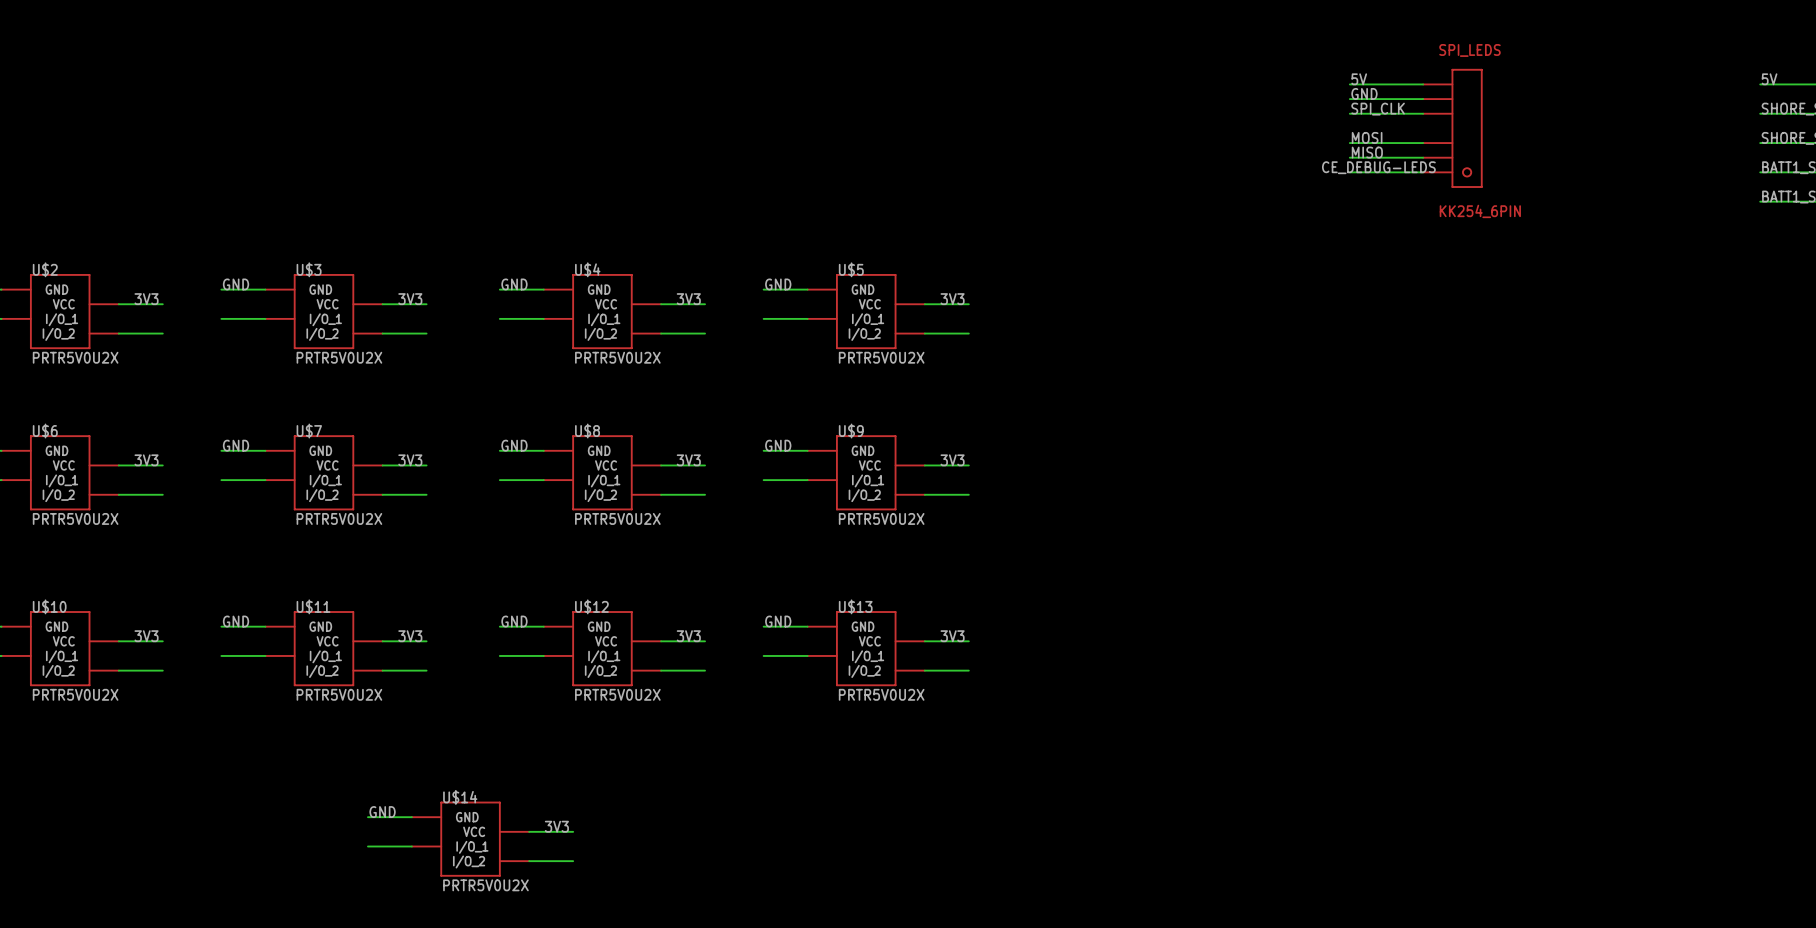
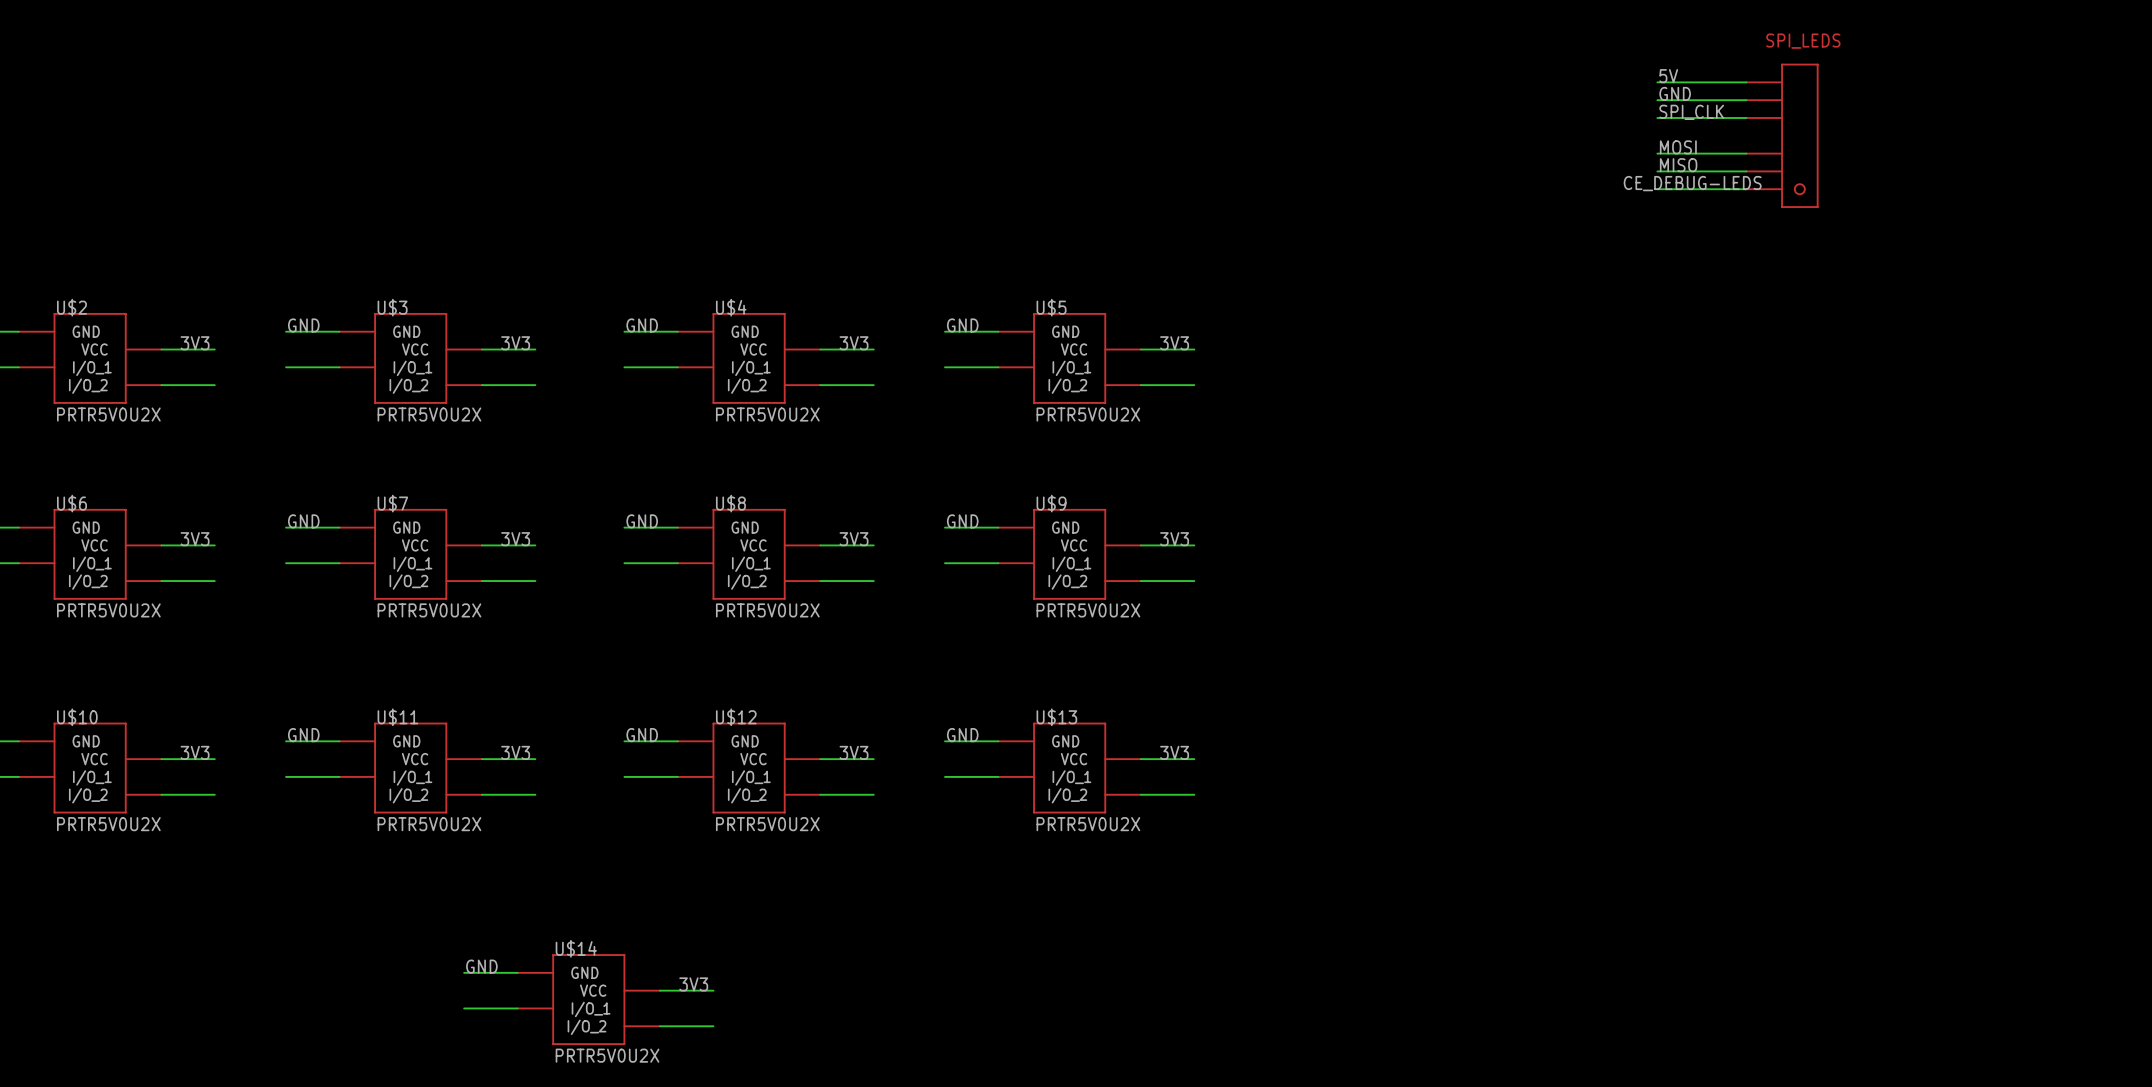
SPI_LEDS value: KK254_6PIN (1480, 211) -> none

